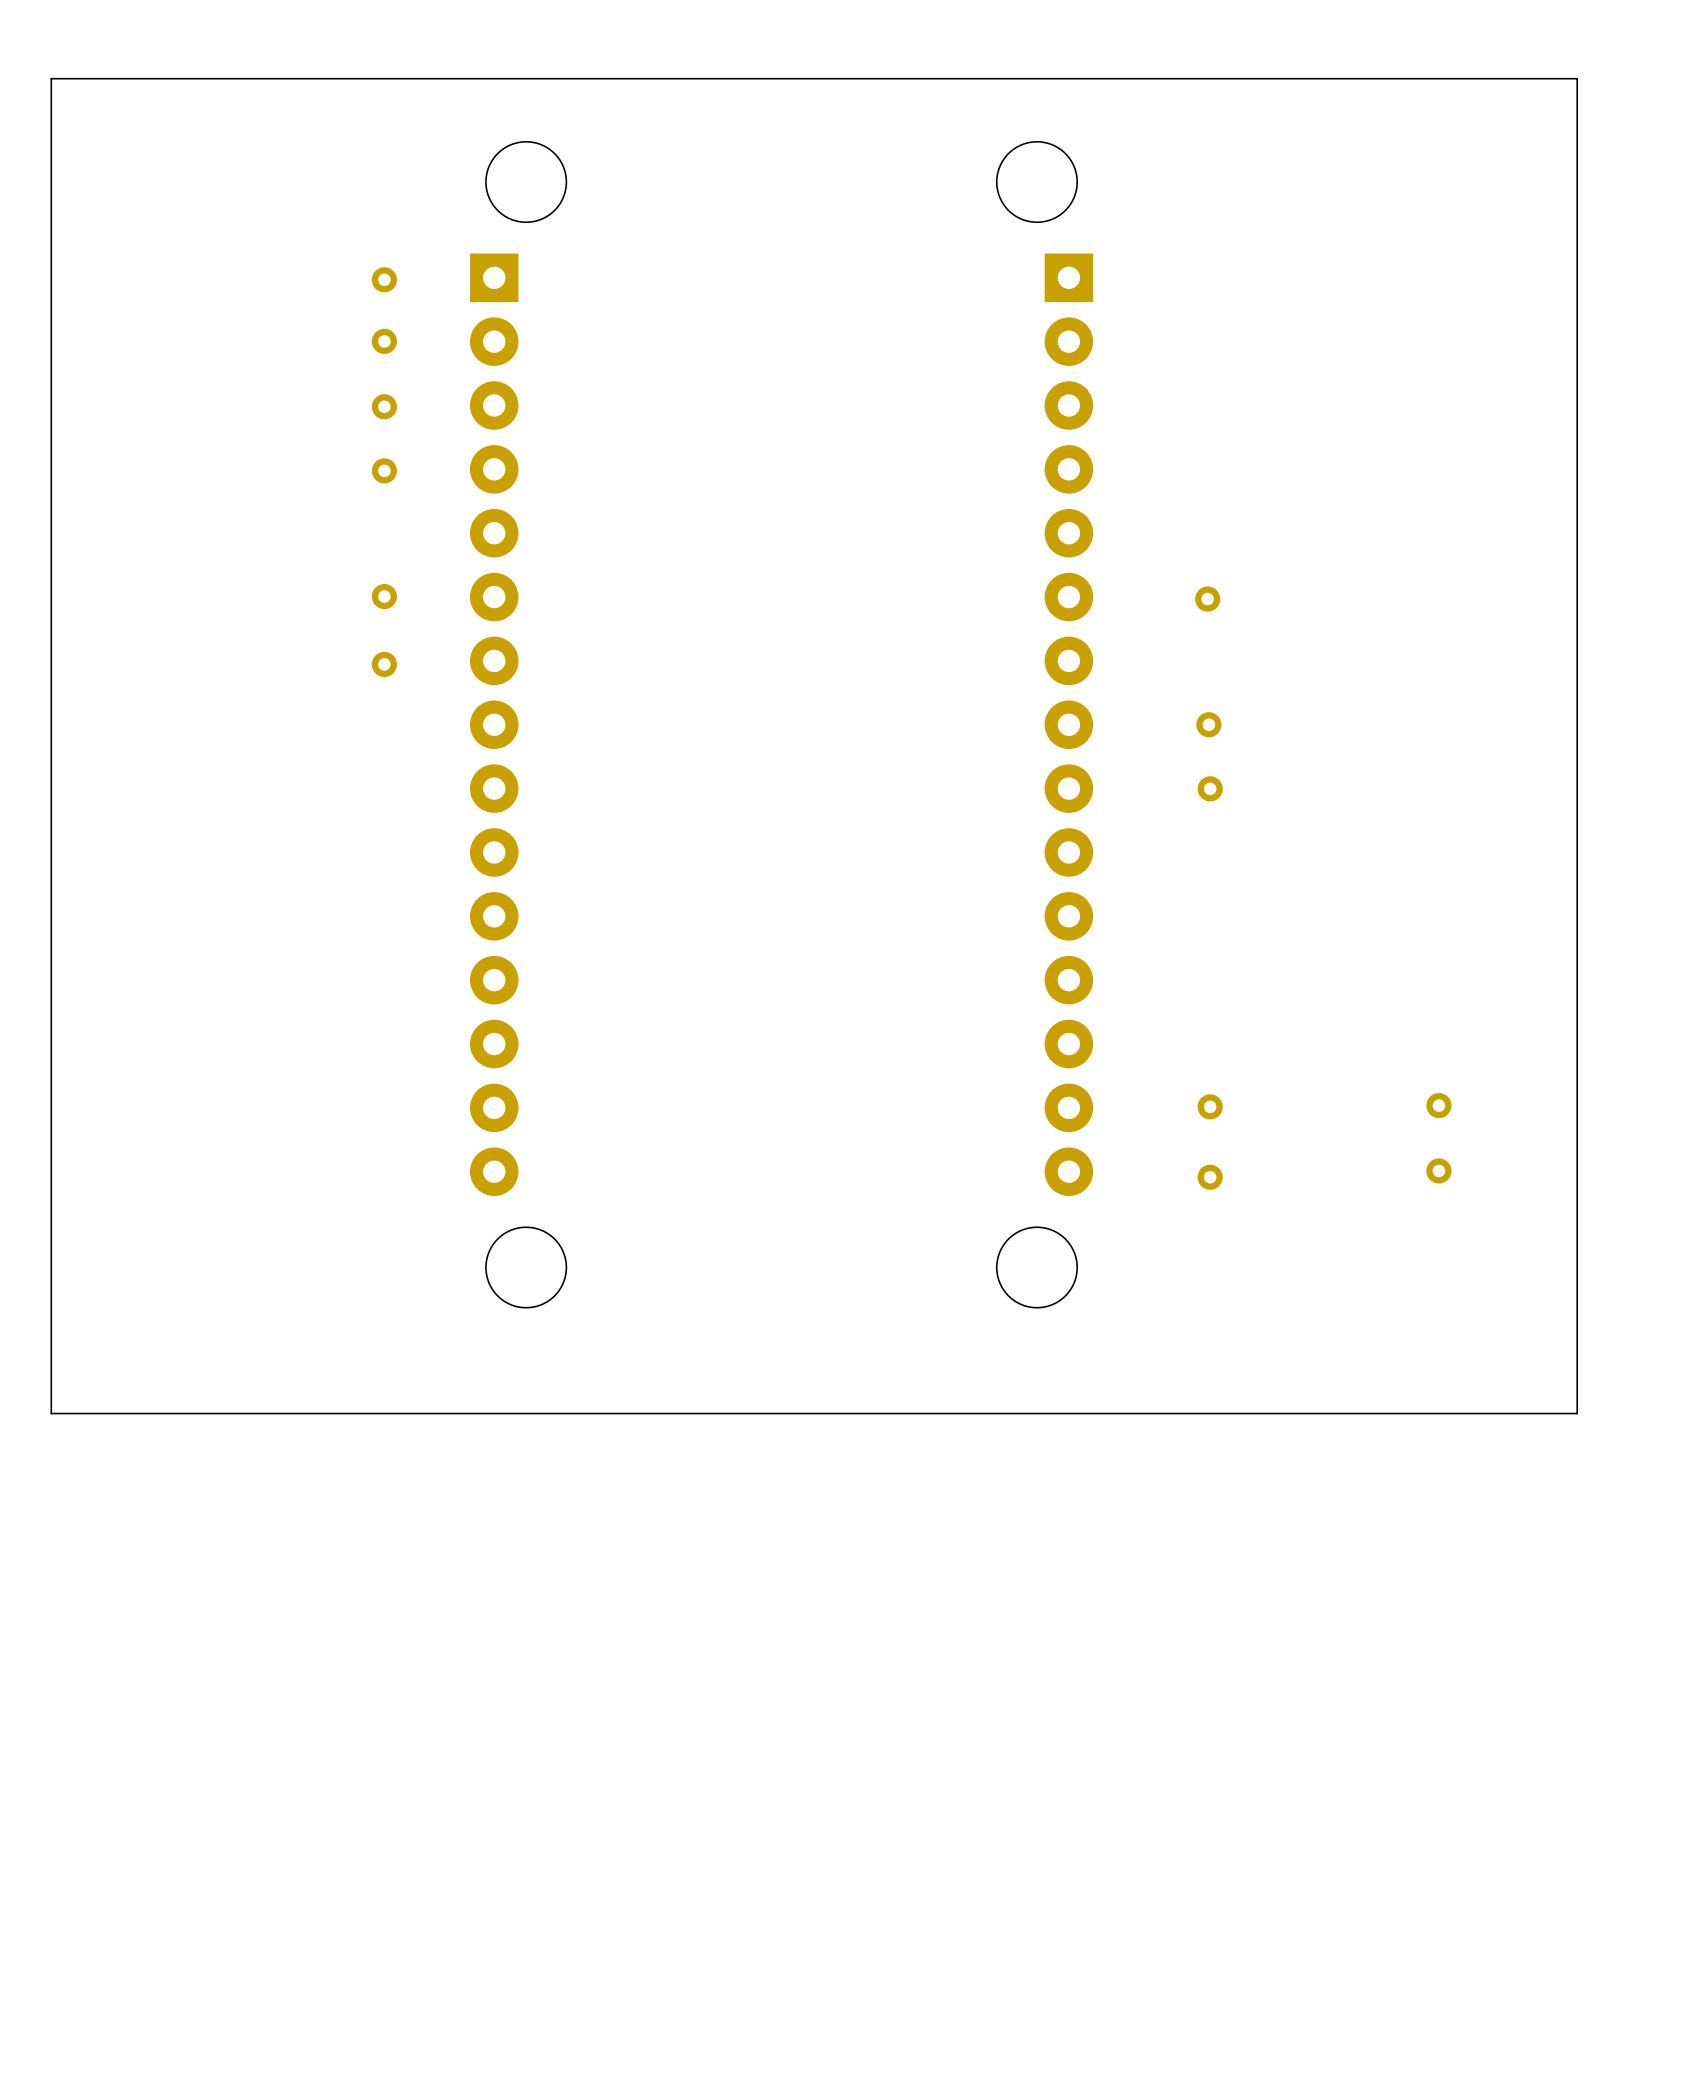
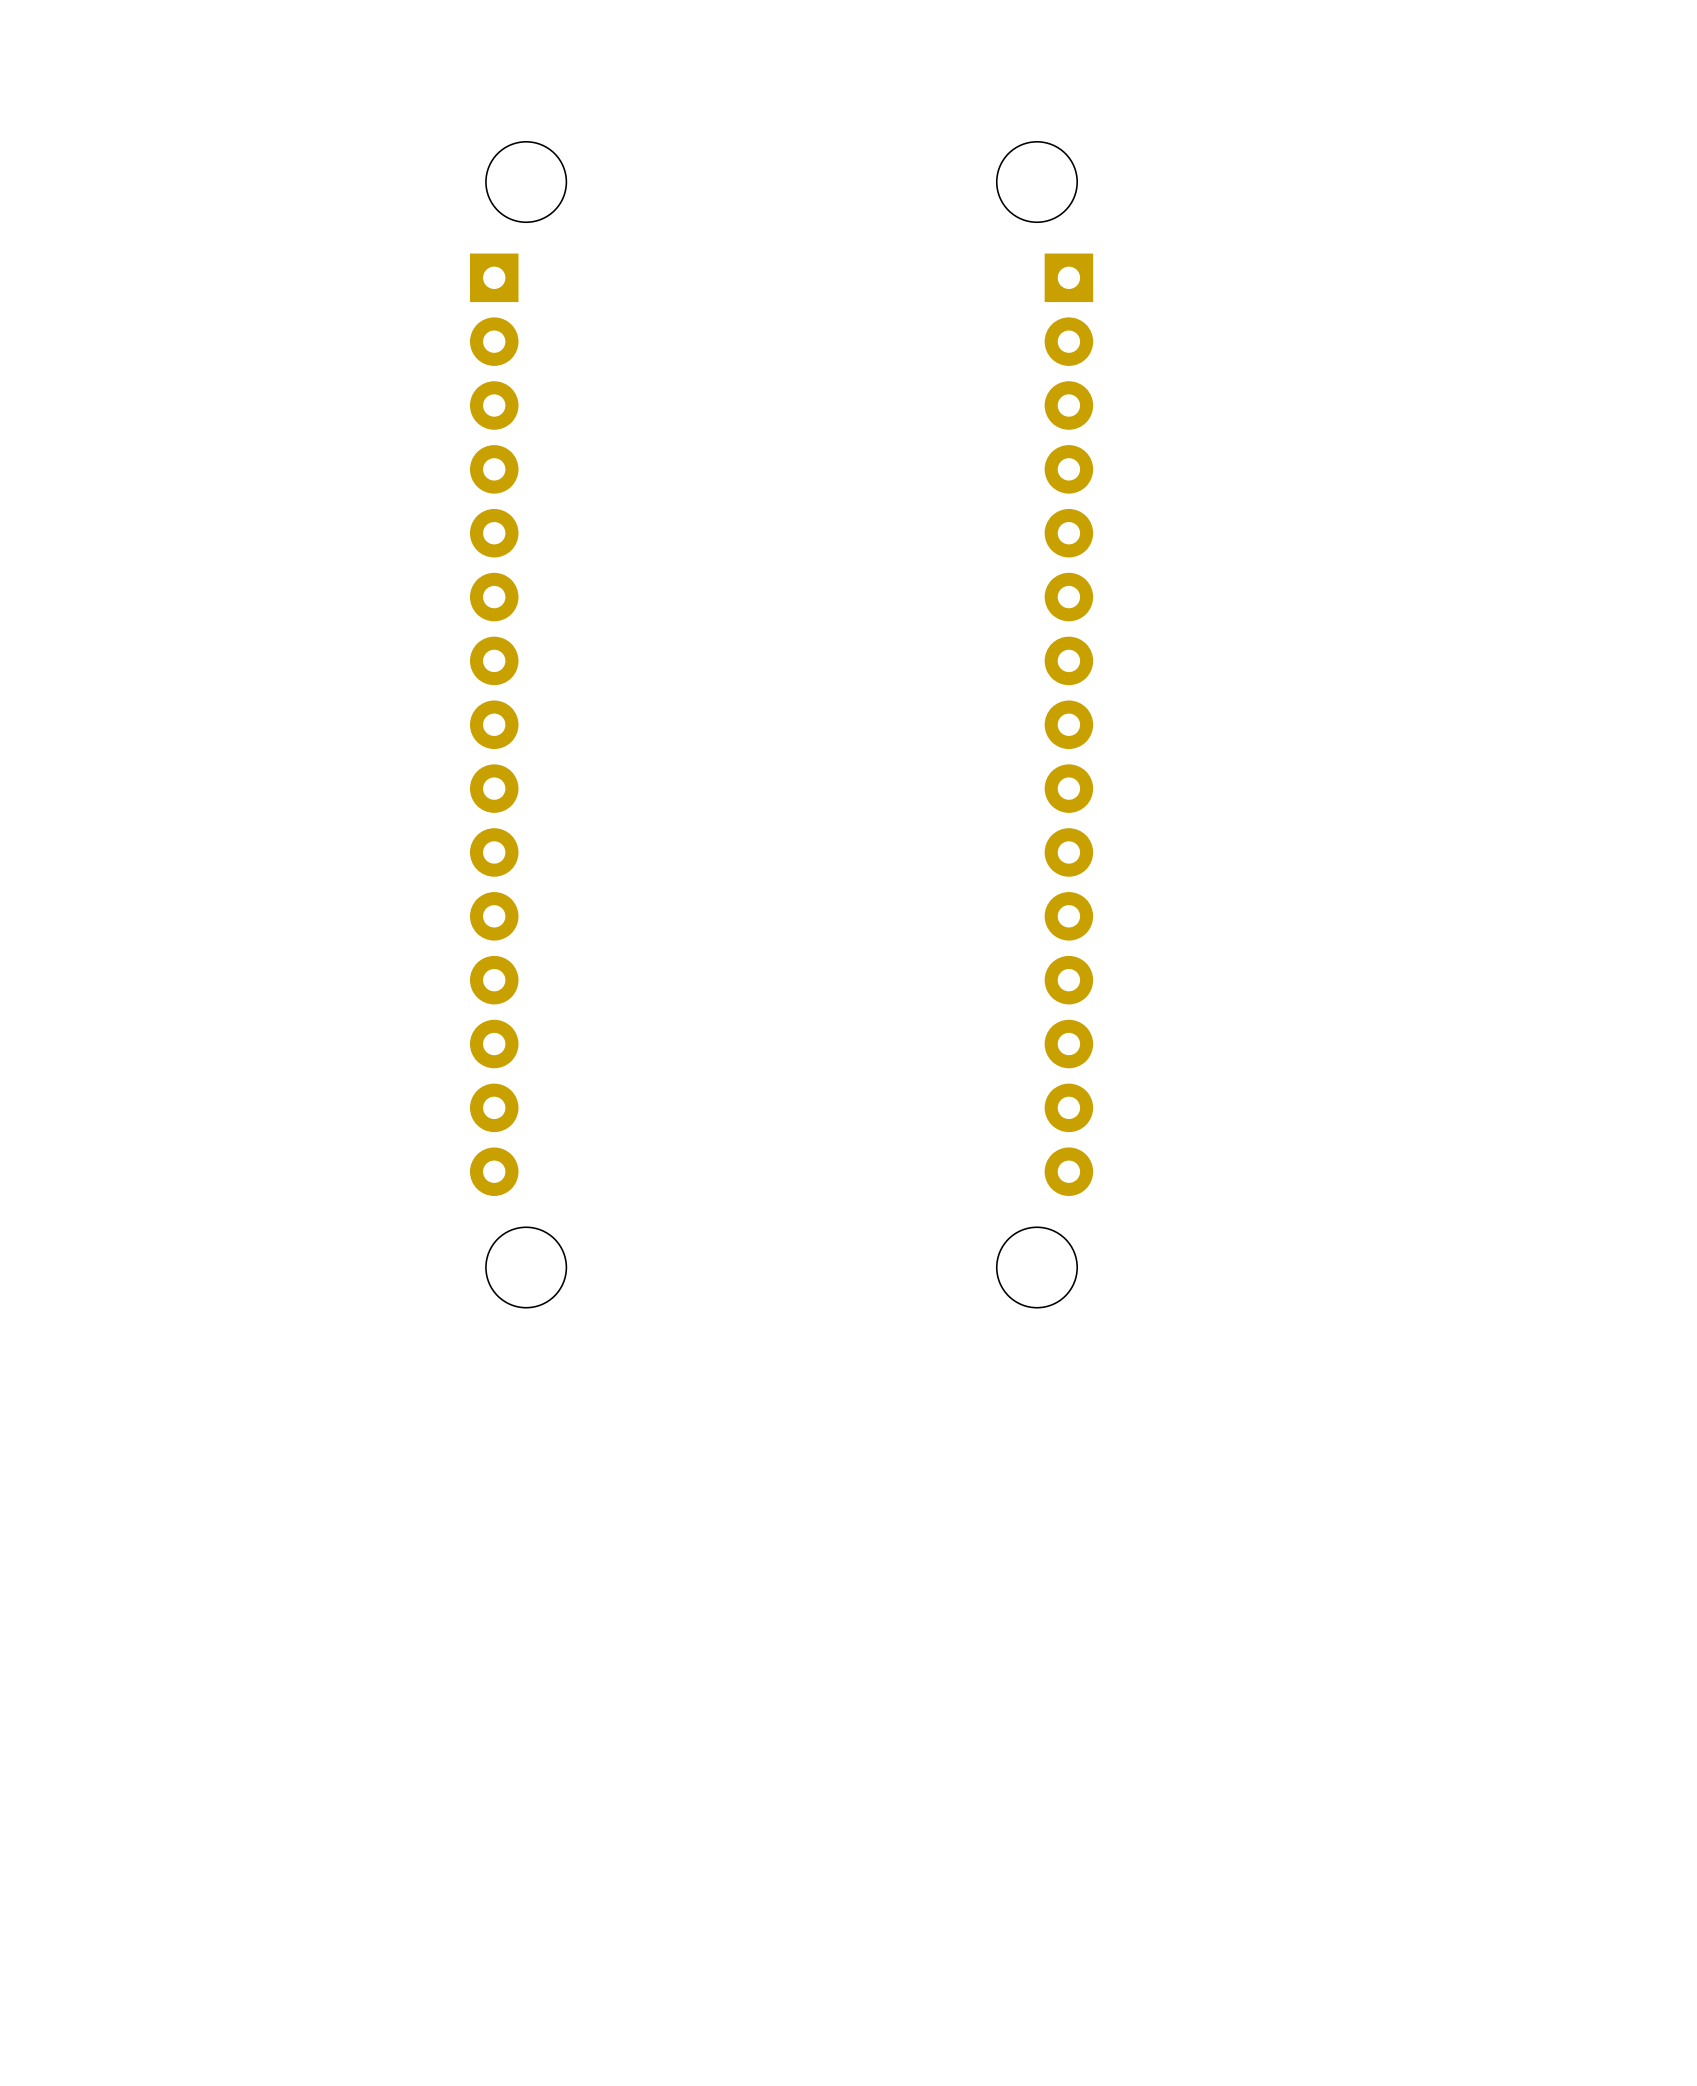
board edge: (1577, 78) (1577, 1413) (51, 1413) (51, 78) (1577, 78) -> none
part: (384, 279) -> none
part: (384, 341) -> none
part: (384, 406) -> none
part: (384, 470) -> none
part: (384, 596) -> none
part: (1207, 599) -> none
part: (384, 664) -> none
part: (1208, 724) -> none
part: (1210, 788) -> none
part: (1438, 1105) -> none
part: (1210, 1106) -> none
part: (1438, 1170) -> none
part: (1210, 1177) -> none

